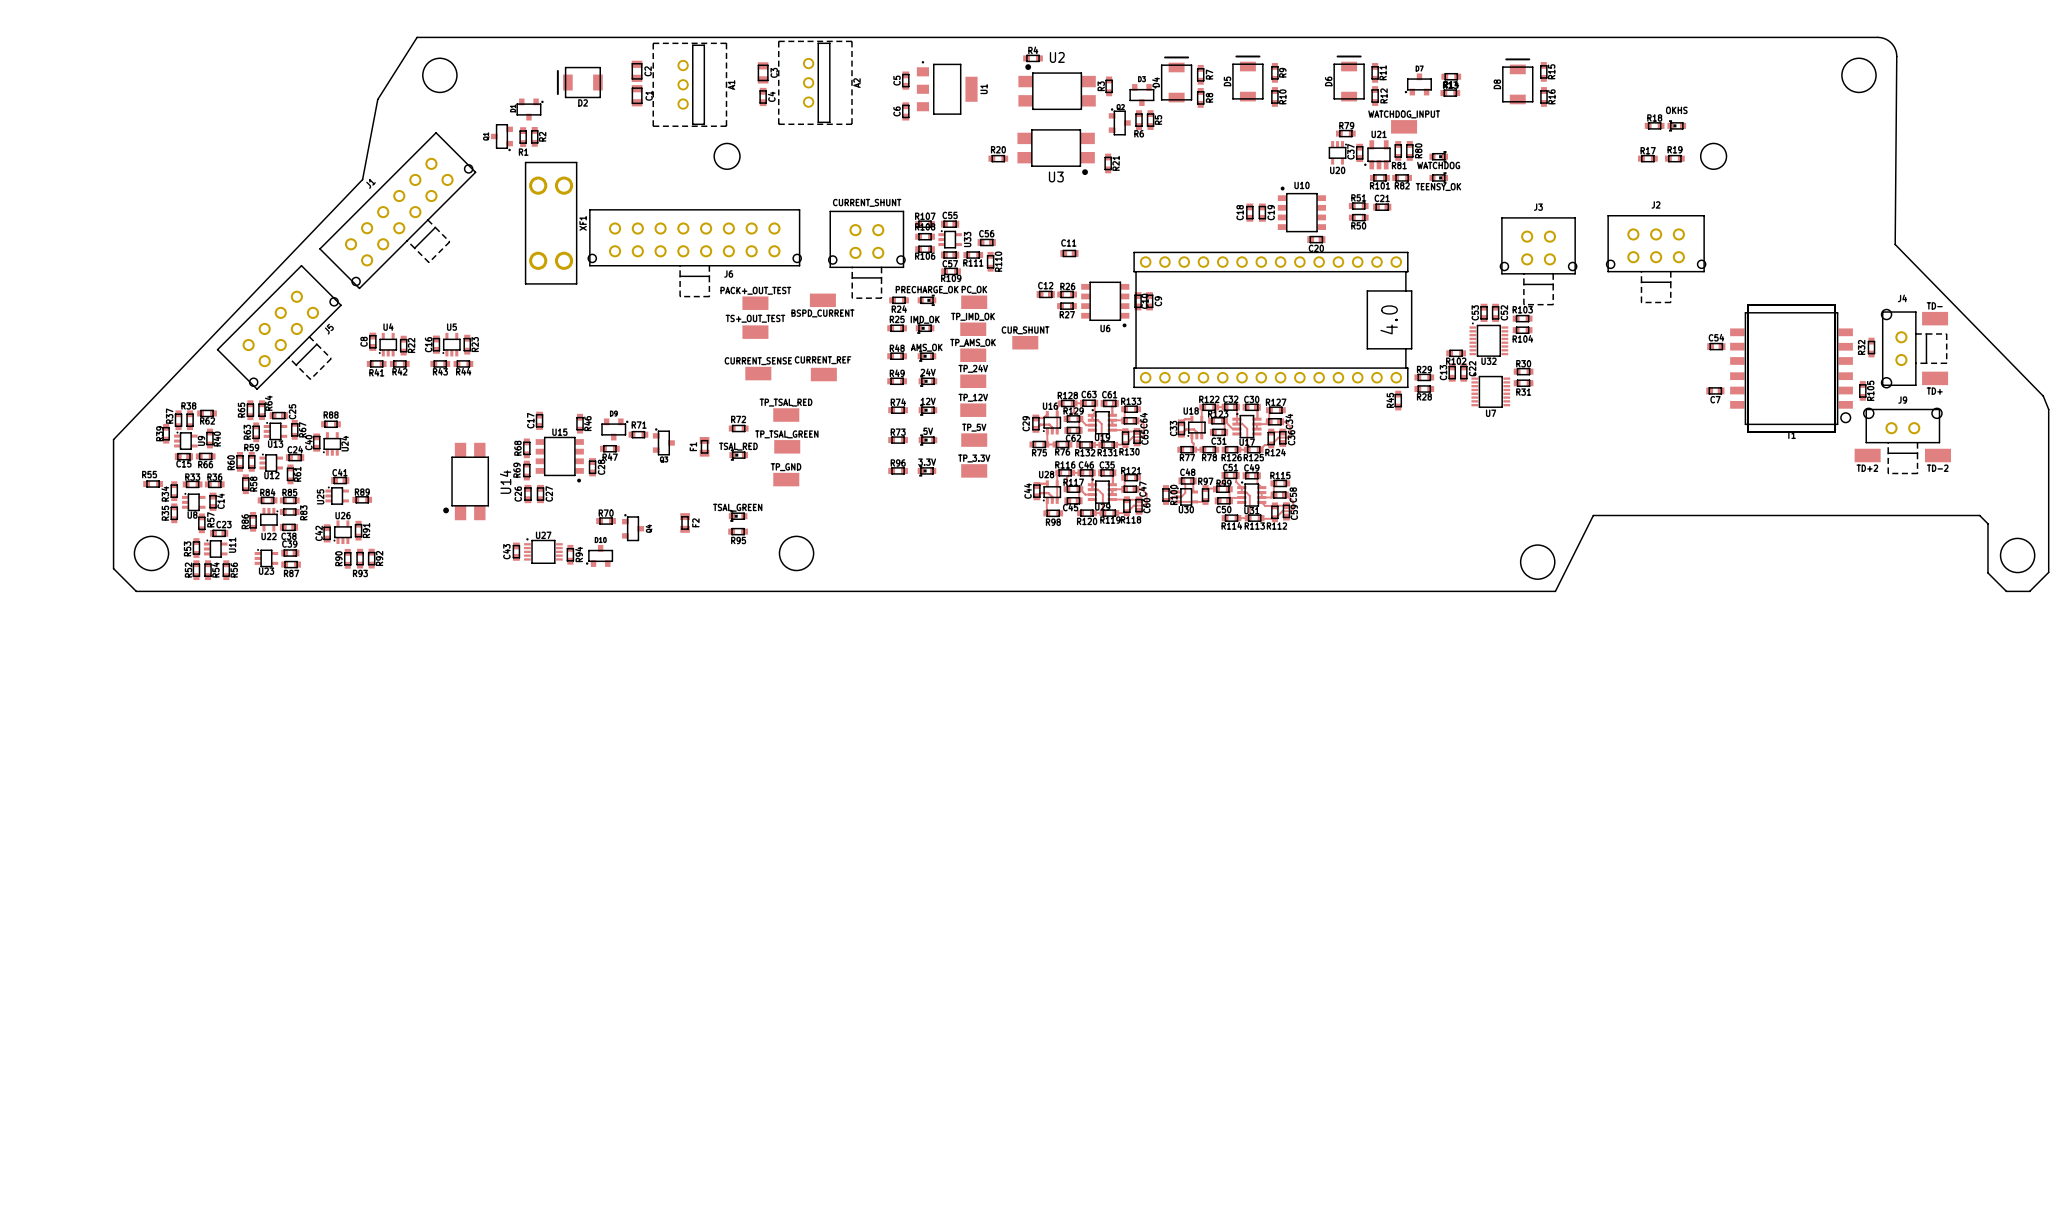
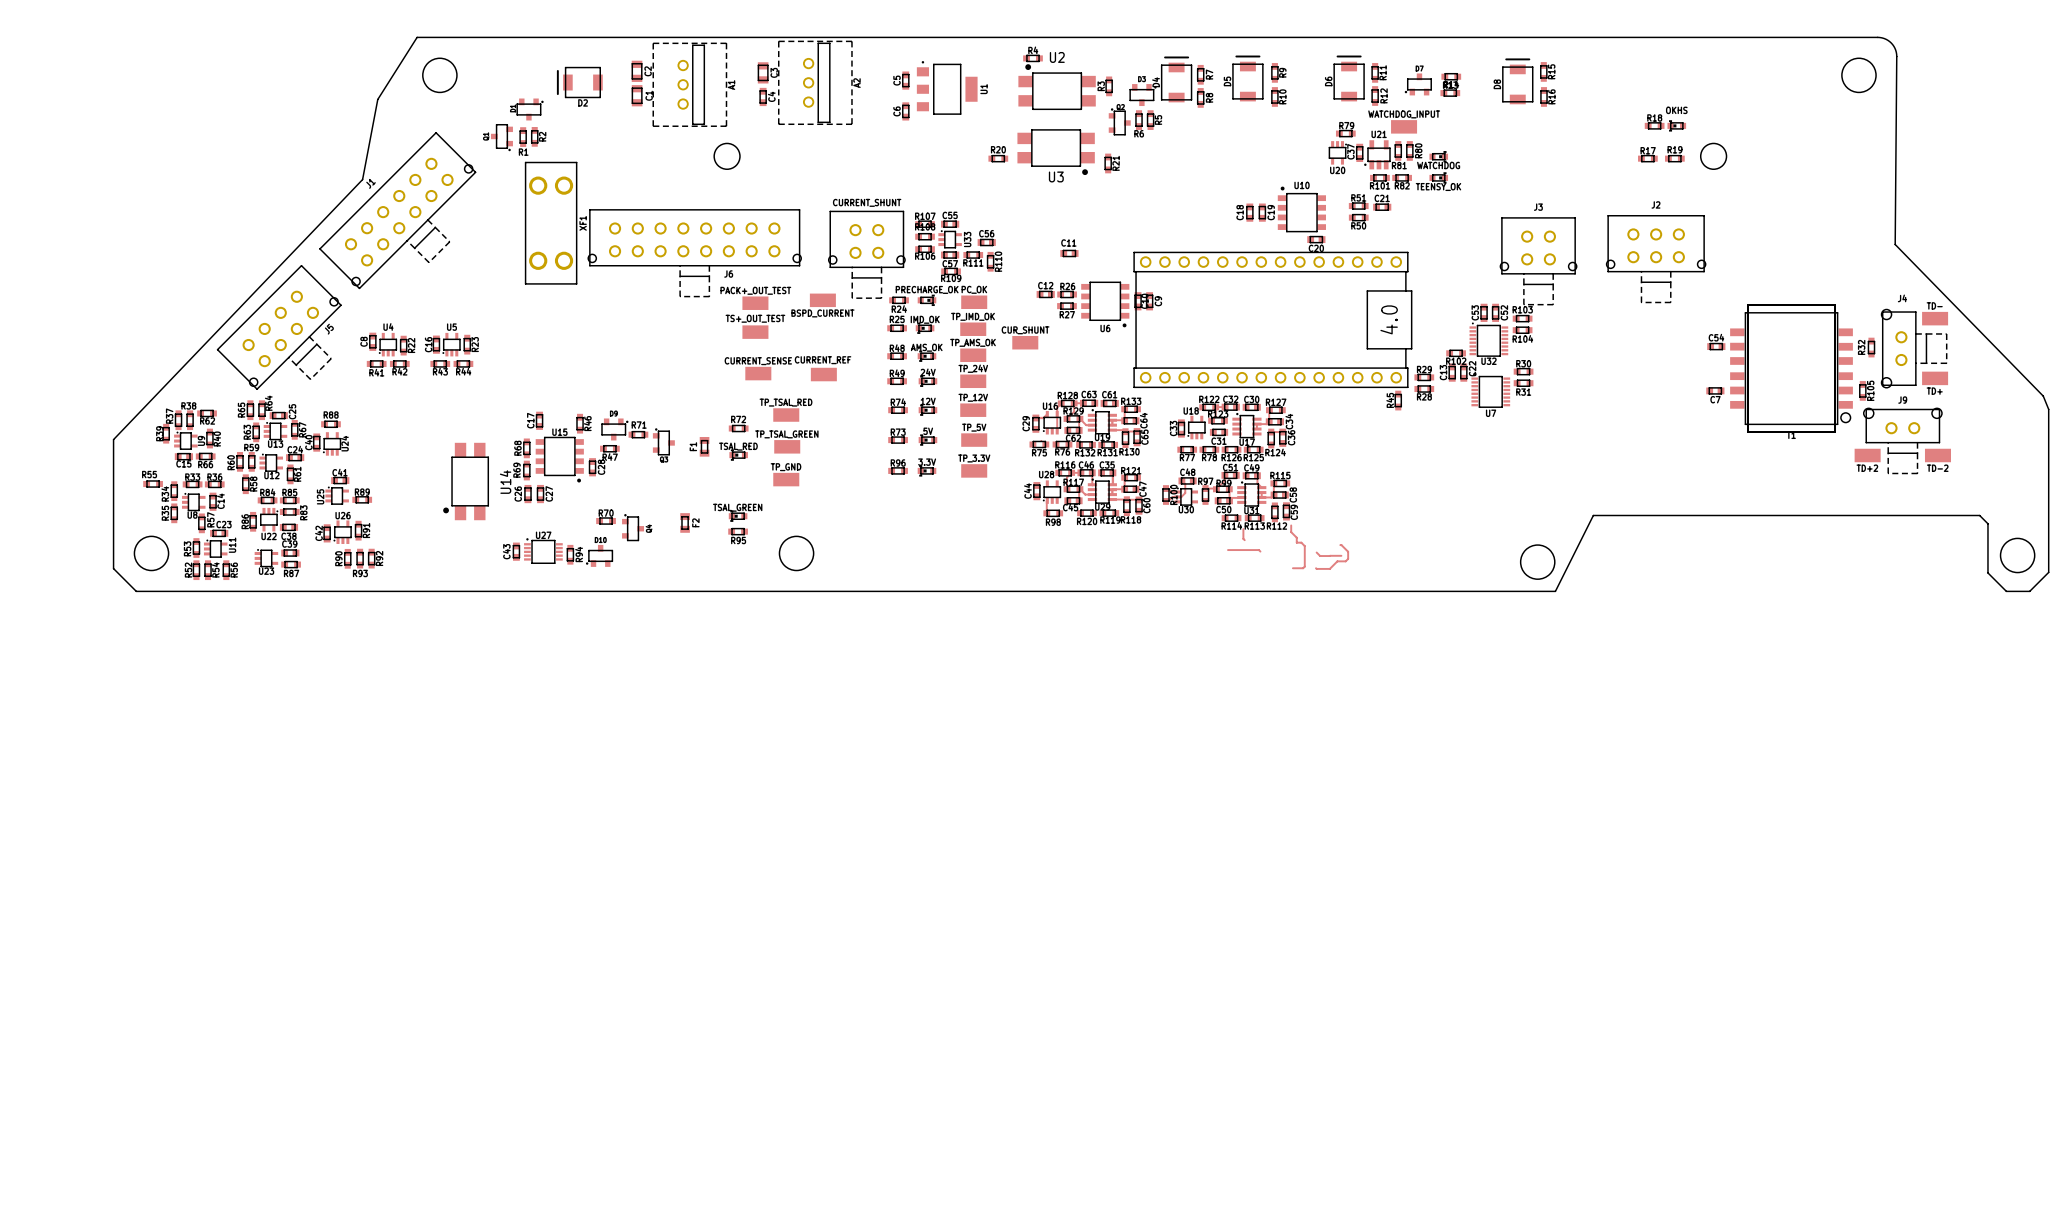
track: (1094, 403) (1092, 420) (1097, 420) (1101, 423) (1101, 444) (1092, 444) -> none
track: (1115, 403) (1112, 406) (1112, 415) -> none
track: (1202, 407) (1201, 435) -> none
track: (1236, 407) (1237, 424) -> none
track: (1257, 407) (1256, 419) -> none
track: (1191, 419) (1185, 419) (1181, 422) -> none
track: (1136, 420) (1139, 420) (1143, 424) (1143, 436) (1132, 437) (1125, 444) (1114, 444) -> none
track: (1224, 420) (1232, 429) (1237, 429) -> none
track: (1225, 421) (1224, 432) -> none
track: (1280, 421) (1285, 421) (1290, 426) (1290, 435) (1287, 437) (1278, 437) (1271, 444) (1264, 444) (1260, 449) -> none
track: (1237, 423) (1242, 423) (1247, 428) (1247, 449) (1237, 449) -> none
track: (1035, 429) (1040, 424) (1049, 424) (1052, 431) -> none
track: (1047, 431) (1045, 444) (1056, 444) -> none
track: (1181, 434) (1186, 429) (1193, 429) (1196, 435) -> none
track: (1191, 435) (1193, 449) (1202, 449) -> none
track: (1058, 472) (1057, 500) -> none
track: (1236, 475) (1236, 482) (1241, 487) (1241, 492) (1246, 492) (1249, 495) (1249, 516) (1237, 518) -> (1291, 525) (1291, 532) (1296, 537) (1296, 542) (1301, 542) (1304, 546) (1304, 566) (1292, 568)
track: (1193, 480) (1194, 492) -> (1243, 529) (1244, 540)
track: (1047, 483) (1036, 485) -> none
track: (1092, 484) (1092, 489) (1097, 489) (1102, 494) (1102, 513) (1093, 513) -> none
track: (1136, 489) (1141, 489) (1146, 494) (1146, 502) (1143, 505) (1133, 505) (1126, 513) (1115, 513) -> none
track: (1285, 495) (1293, 501) (1293, 508) (1290, 511) (1282, 511) (1274, 518) (1261, 518) -> (1340, 545) (1348, 551) (1348, 558) (1345, 561) (1337, 561) (1329, 568) (1316, 568)
track: (1036, 496) (1040, 493) (1048, 493) (1052, 496) (1052, 500) -> none
track: (1205, 501) (1177, 501) -> none
track: (1261, 502) (1265, 505) (1286, 505) -> (1316, 552) (1320, 556) (1341, 555)
track: none -> (1228, 550) (1260, 551)

